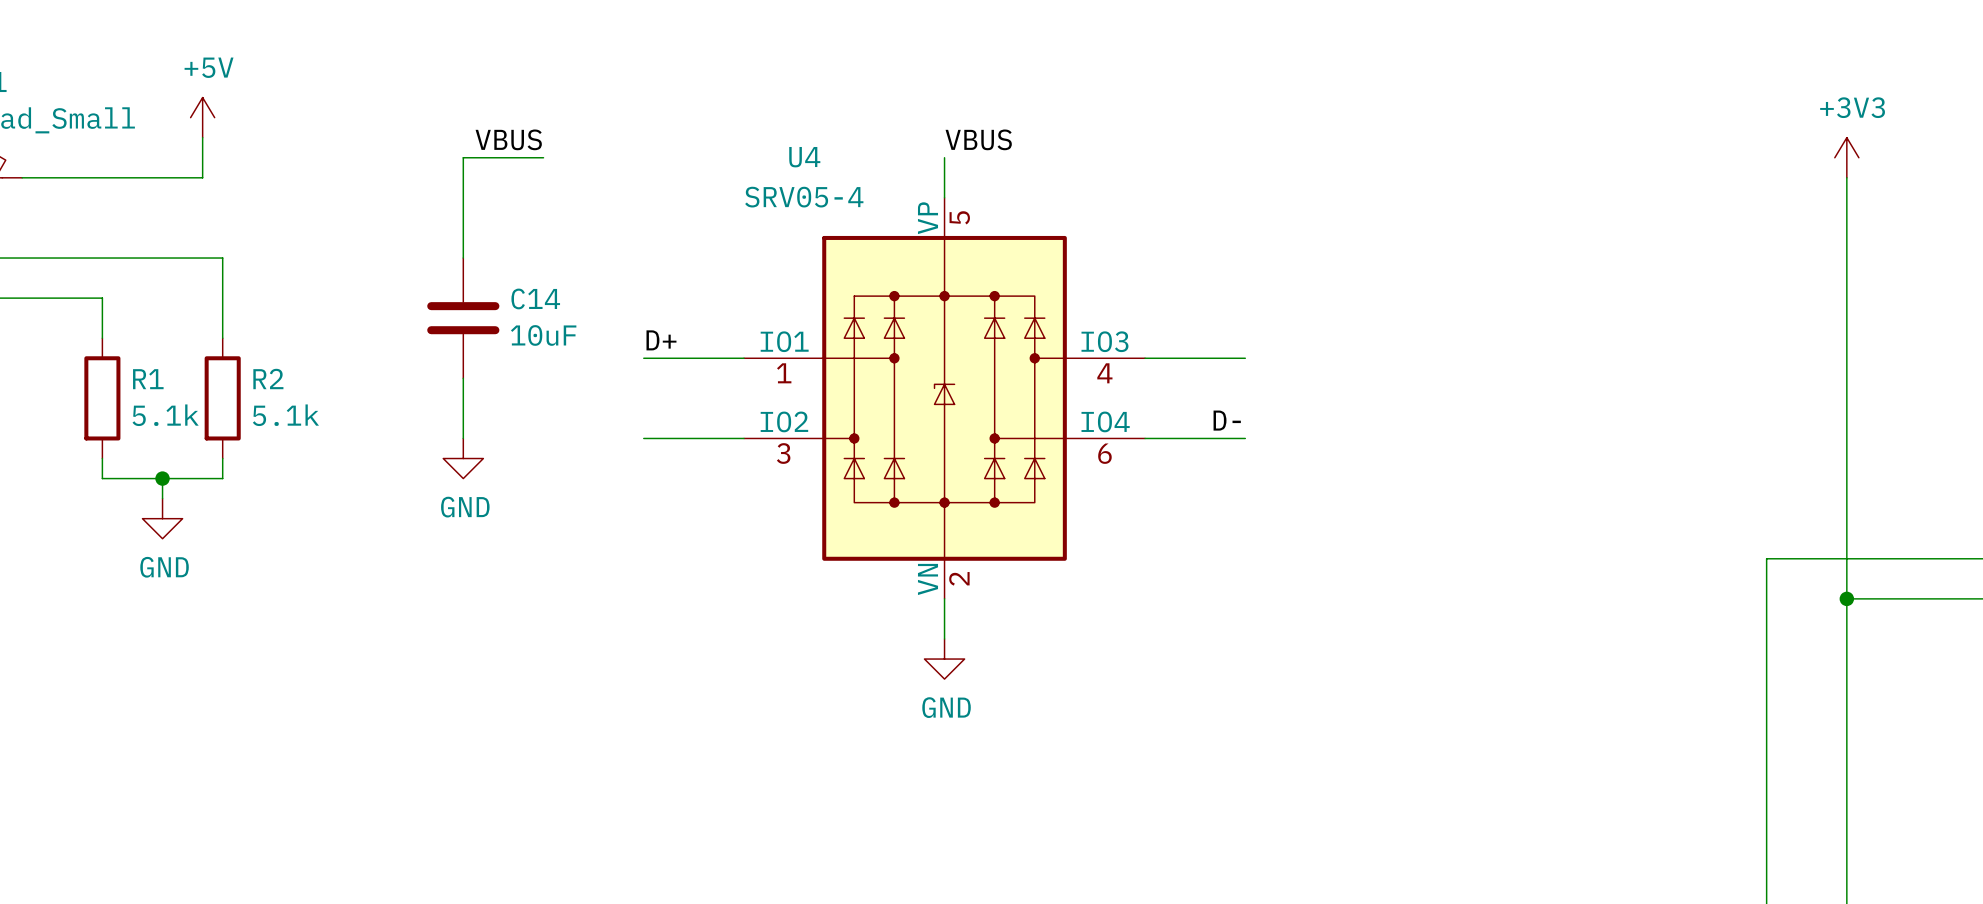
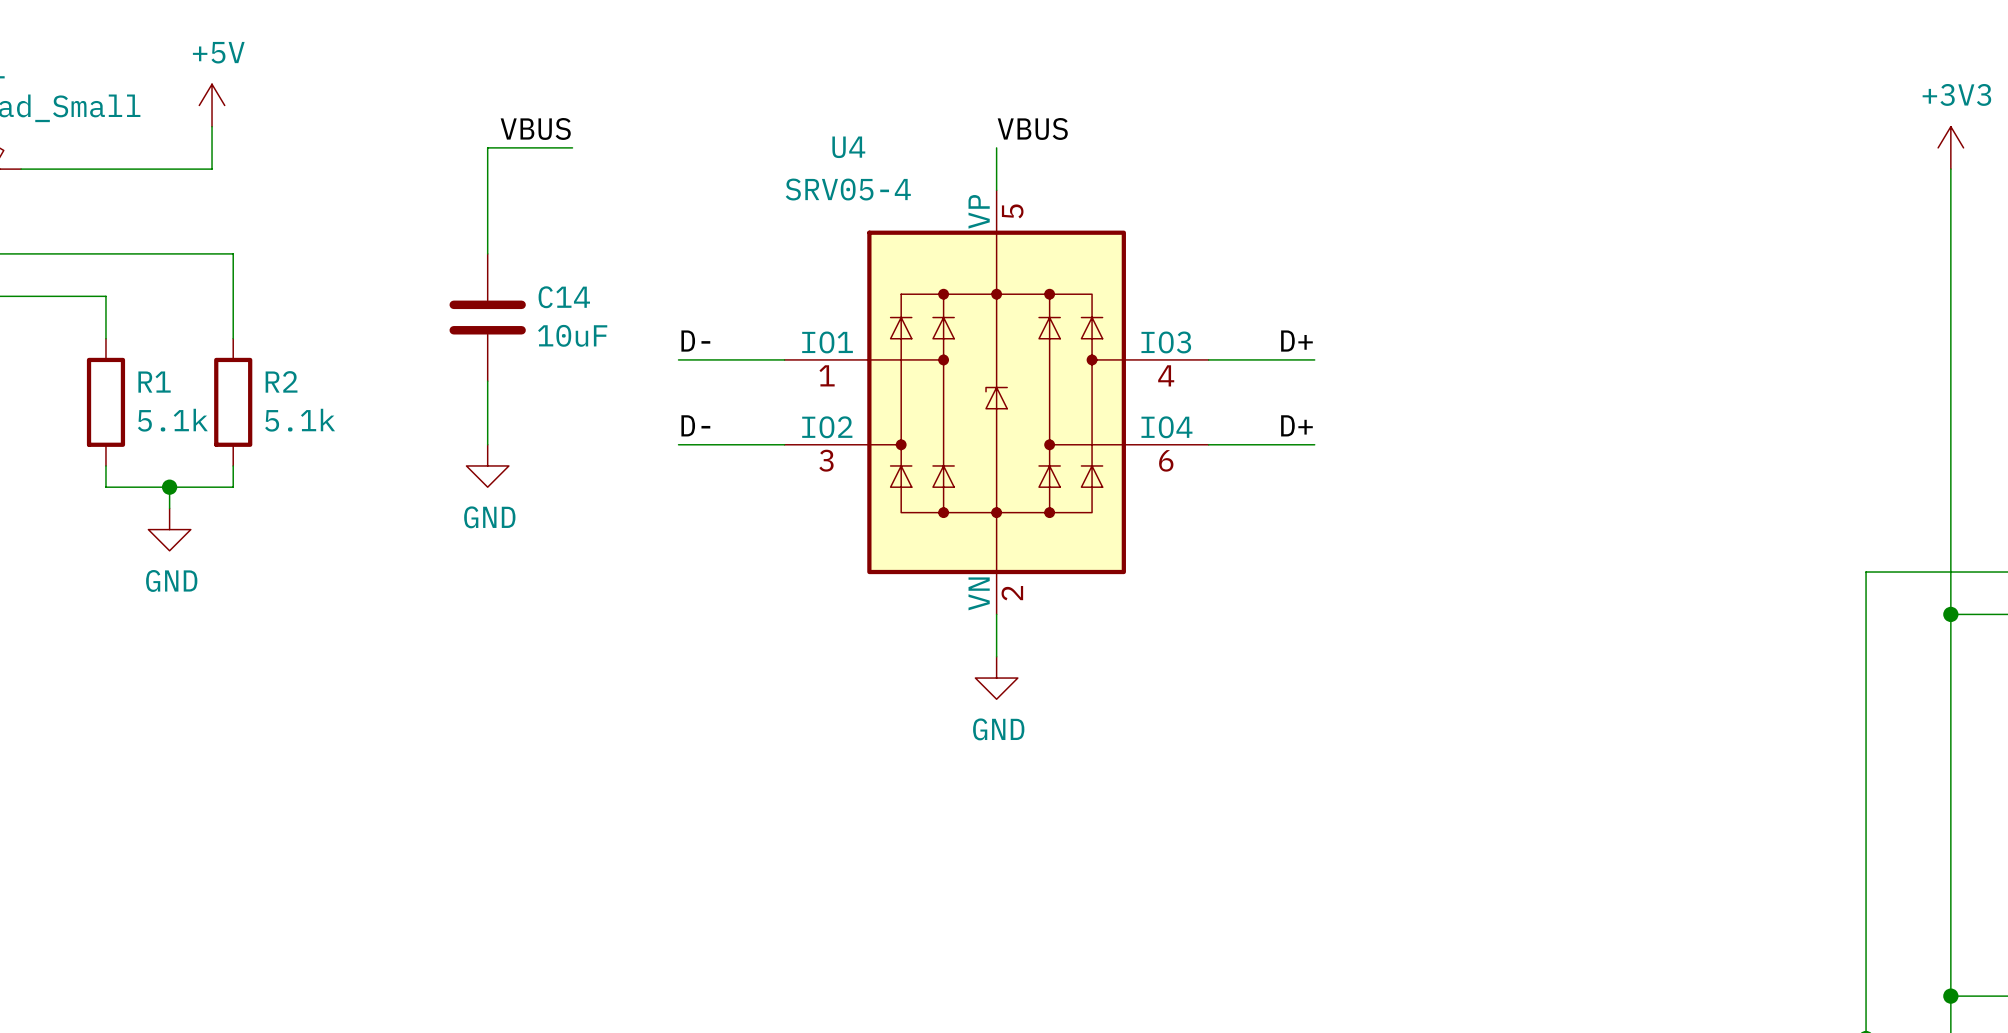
label: D+ (661, 340) -> D- (695, 341)
label: none -> D+ (1296, 341)
label: none -> D- (695, 425)
label: D- (1227, 420) -> D+ (1296, 425)

